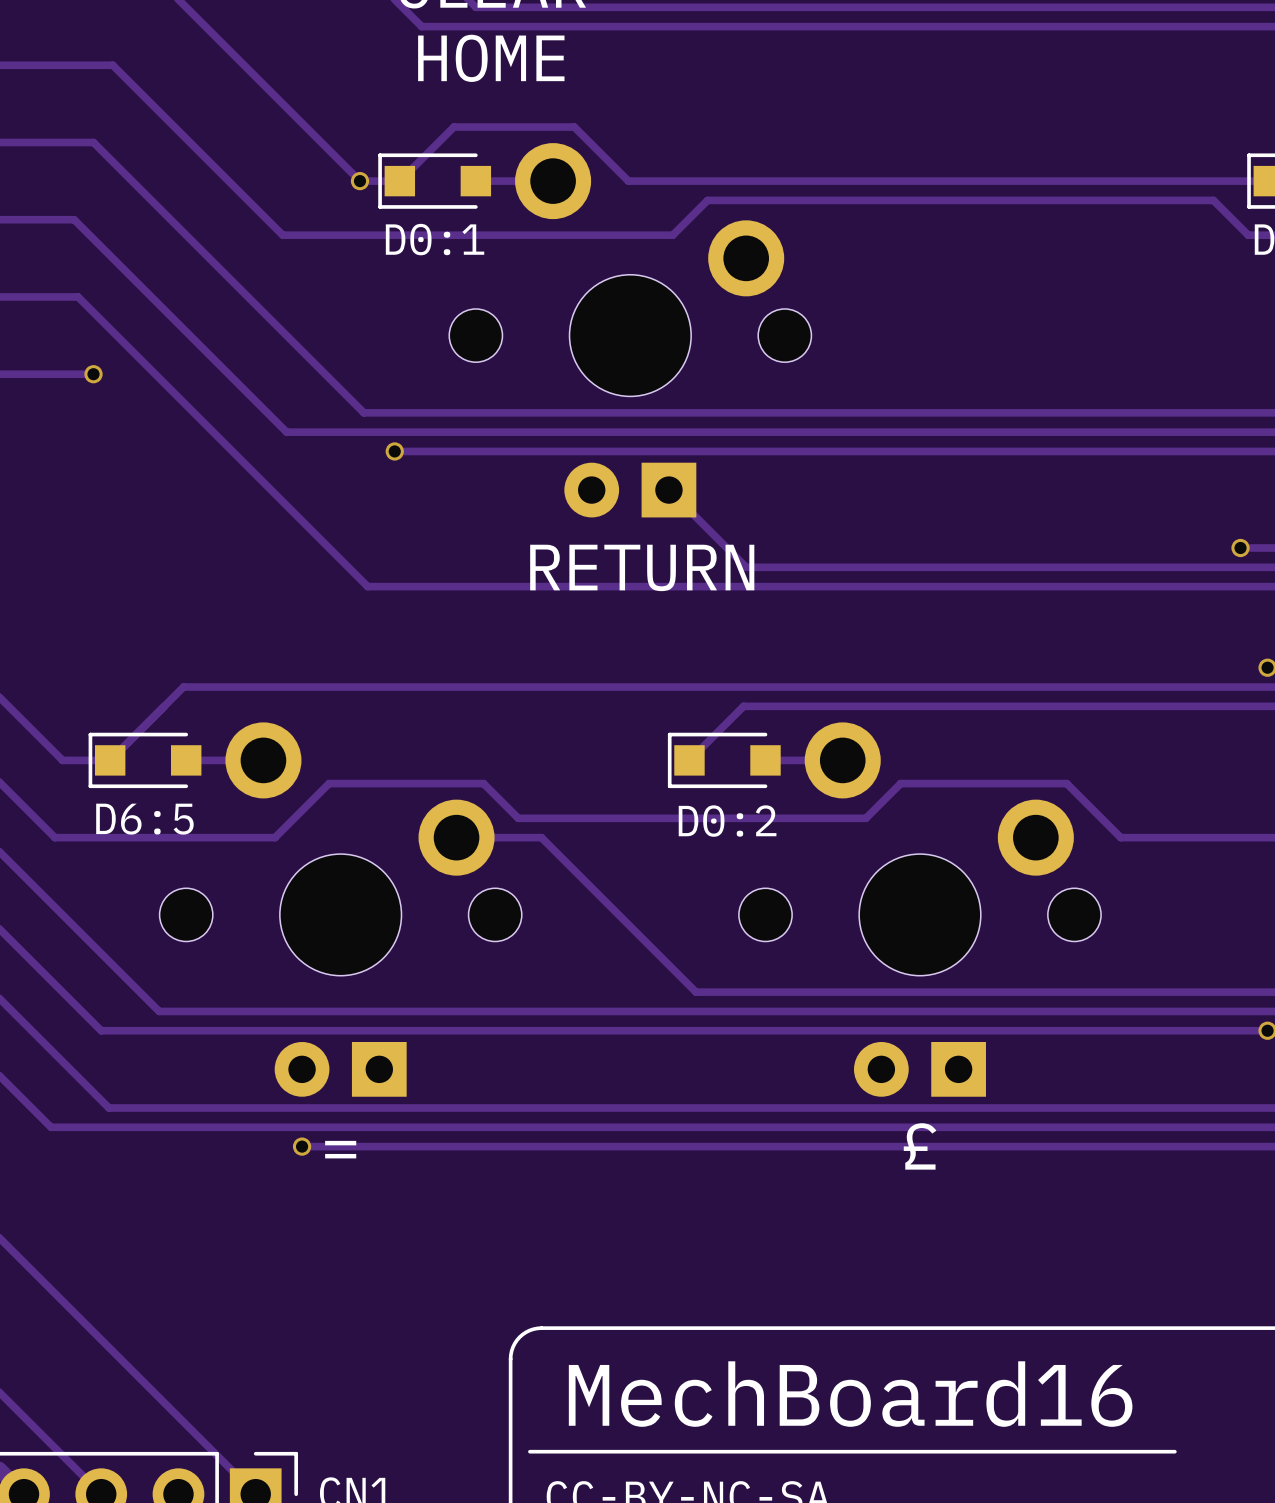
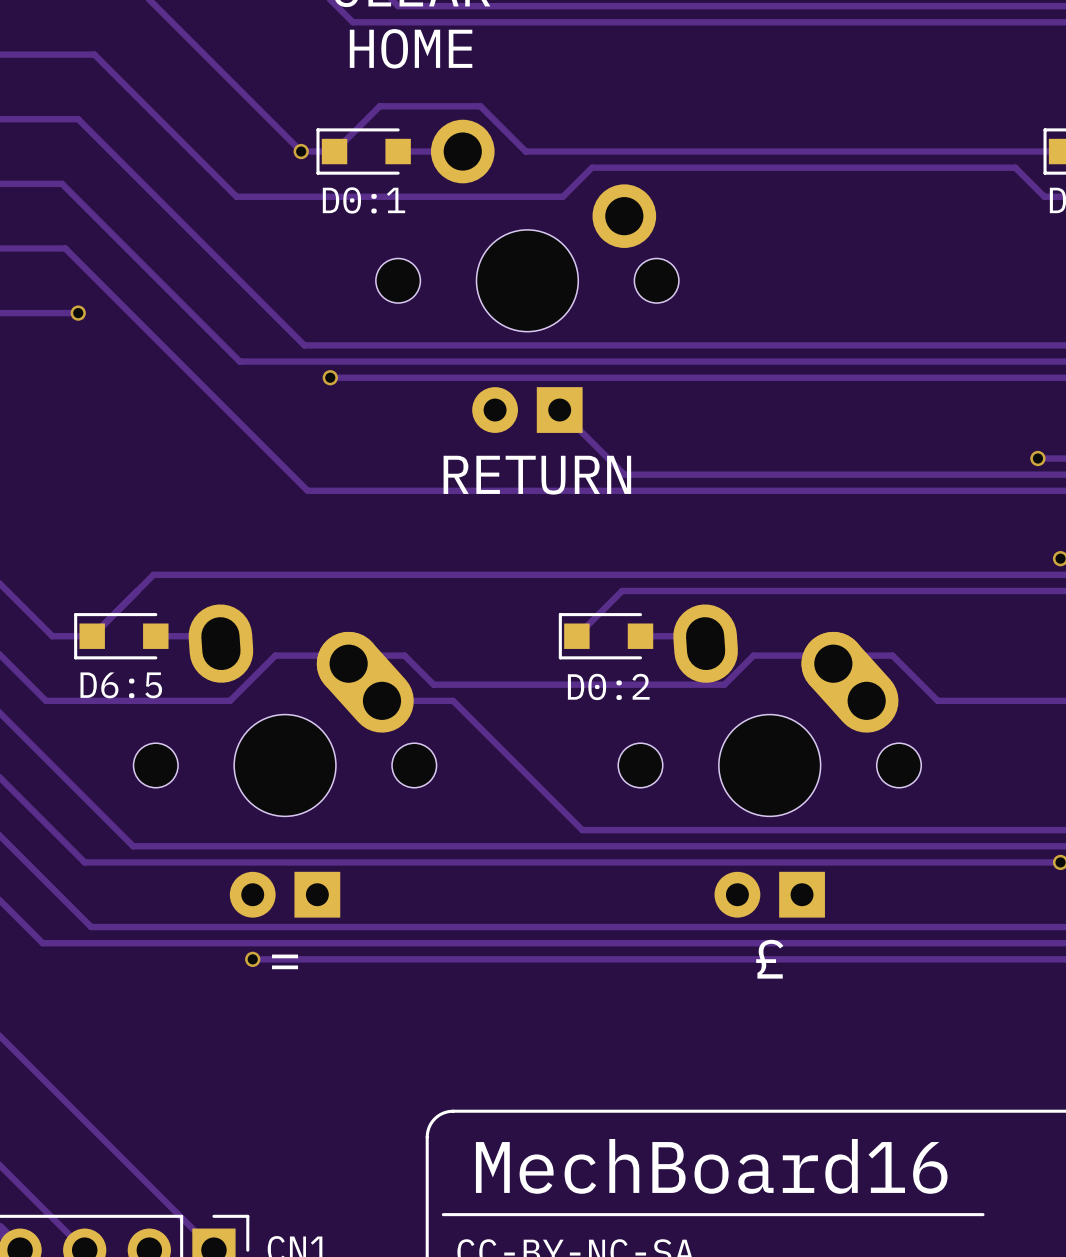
part footprint: [159, 722, 522, 976] -> [133, 604, 437, 817]
part footprint: [738, 722, 1102, 976] -> [618, 604, 922, 817]

